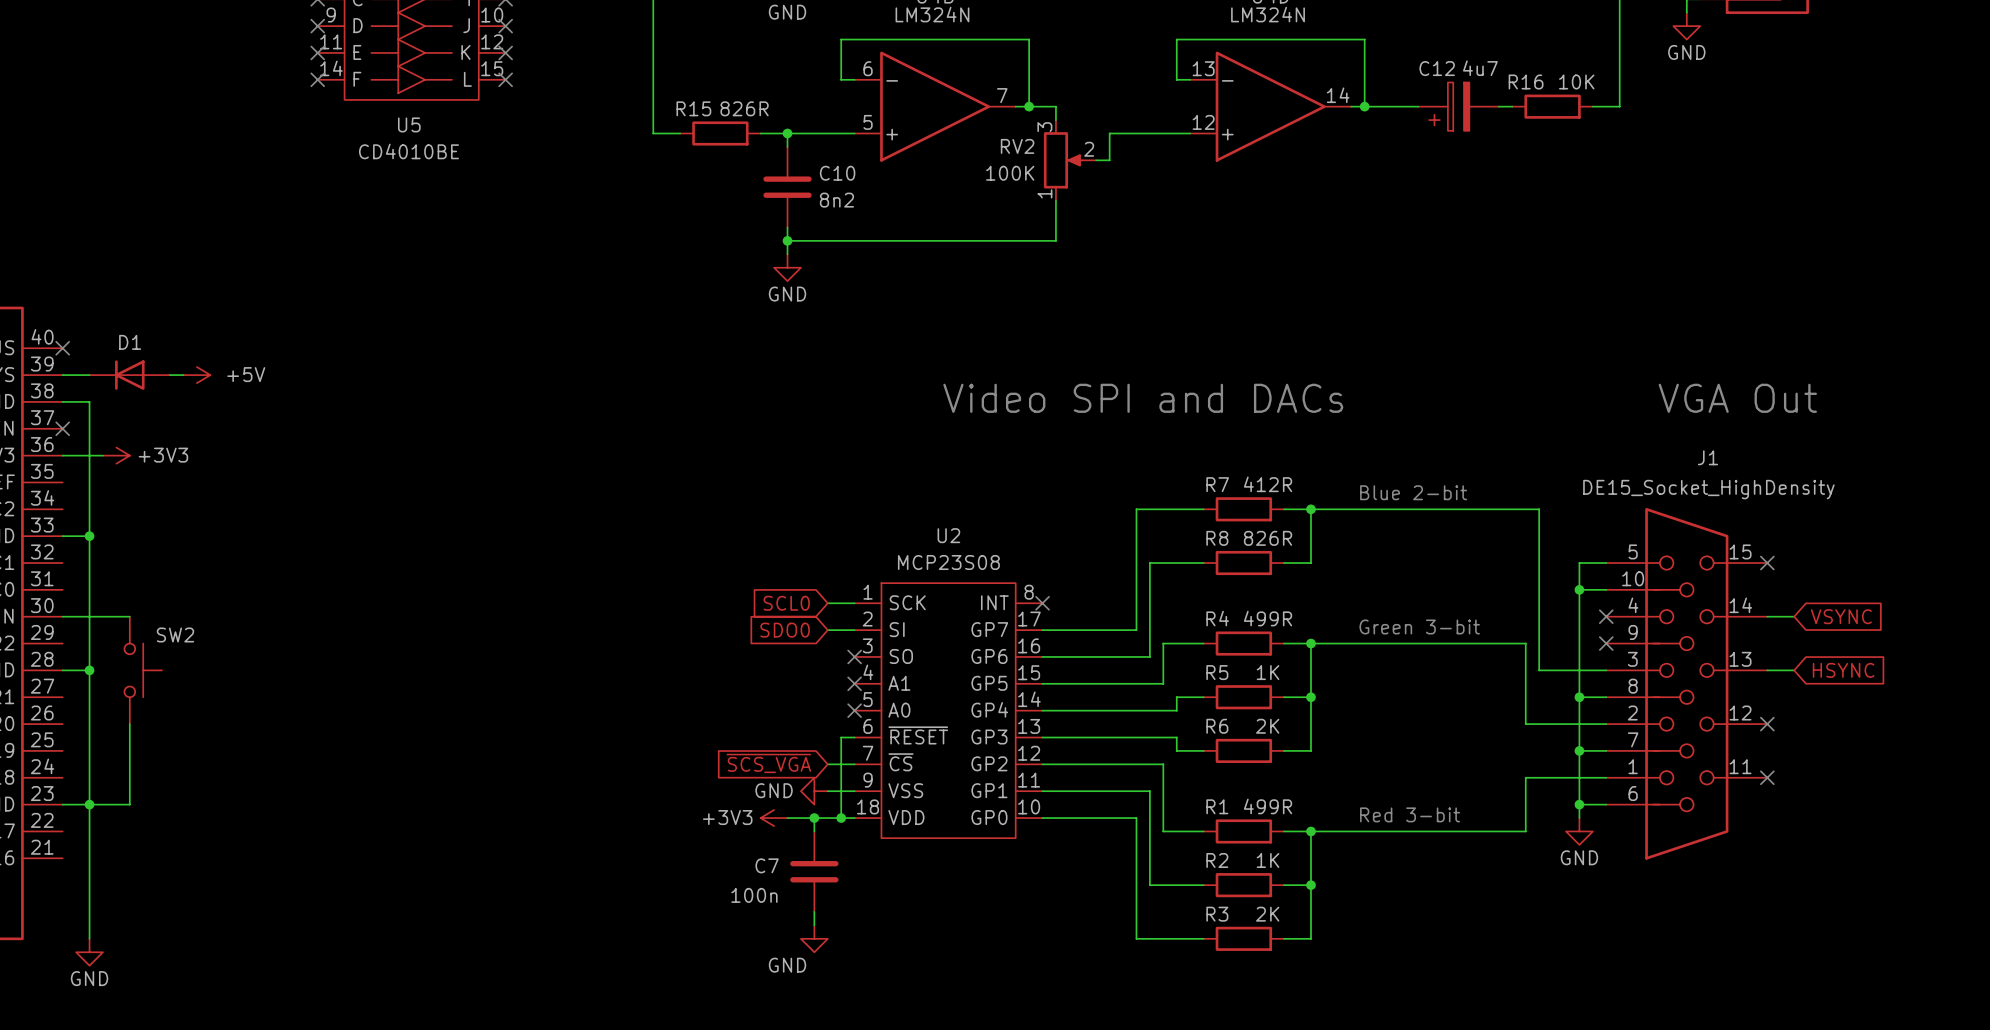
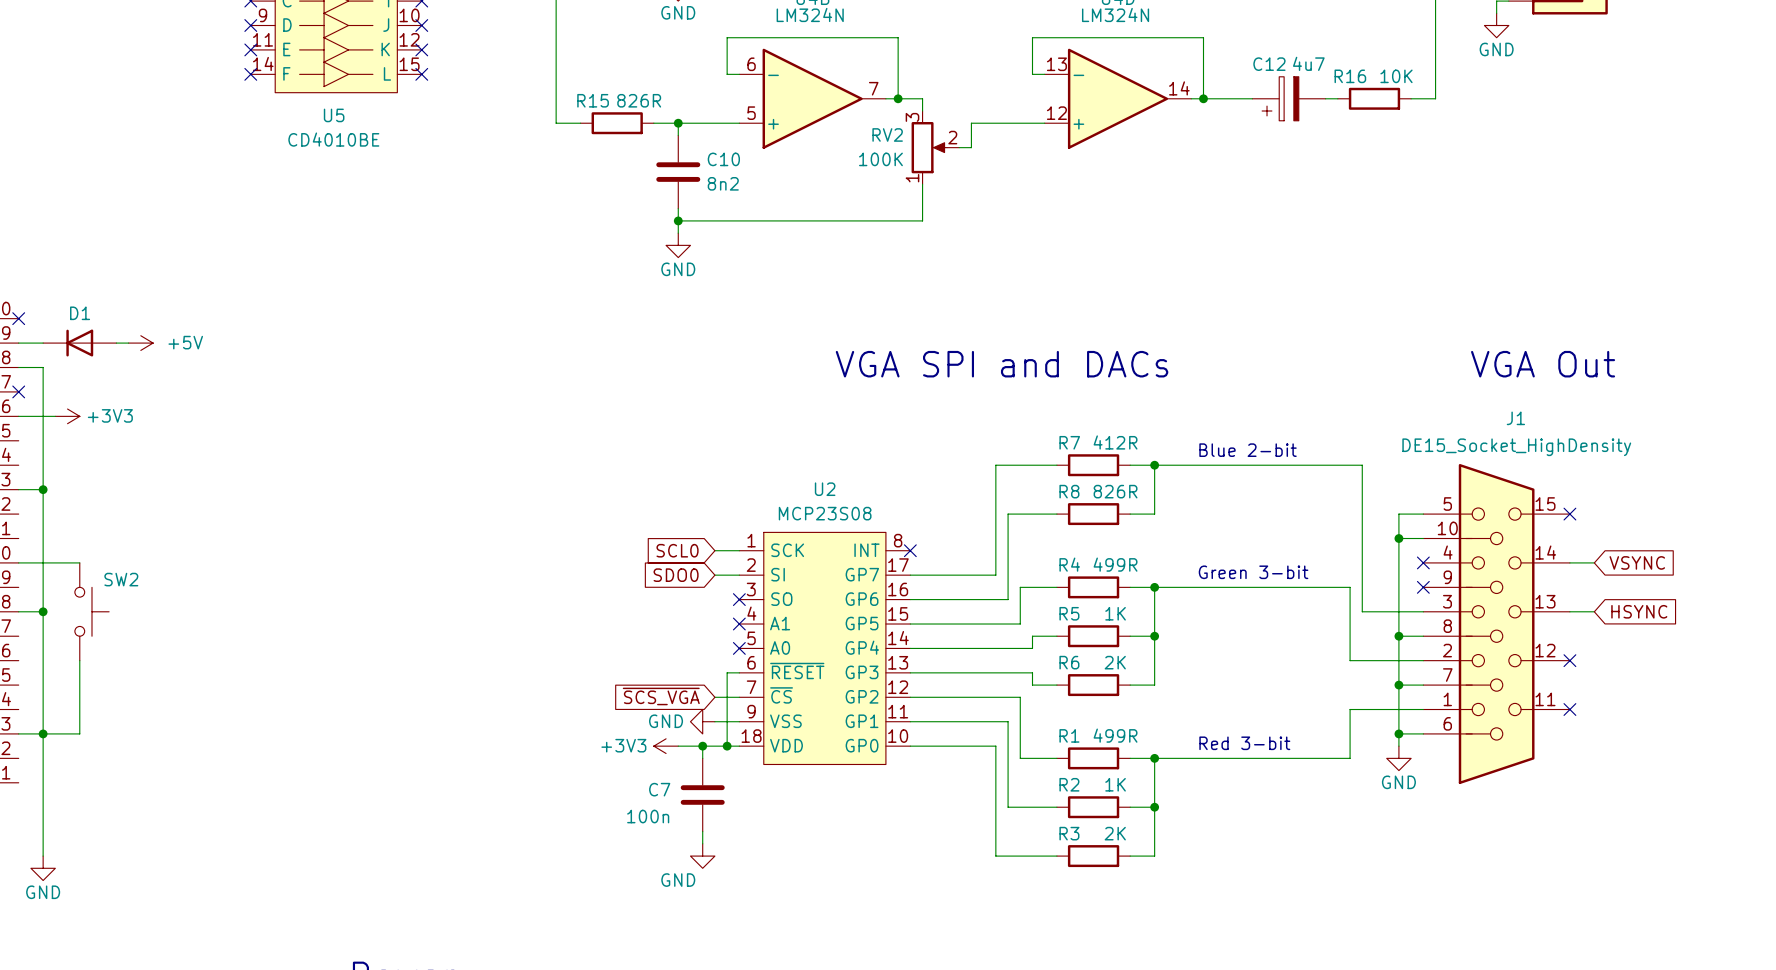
text: Video SPI and DACs (1143, 398) -> VGA SPI and DACs (1002, 364)

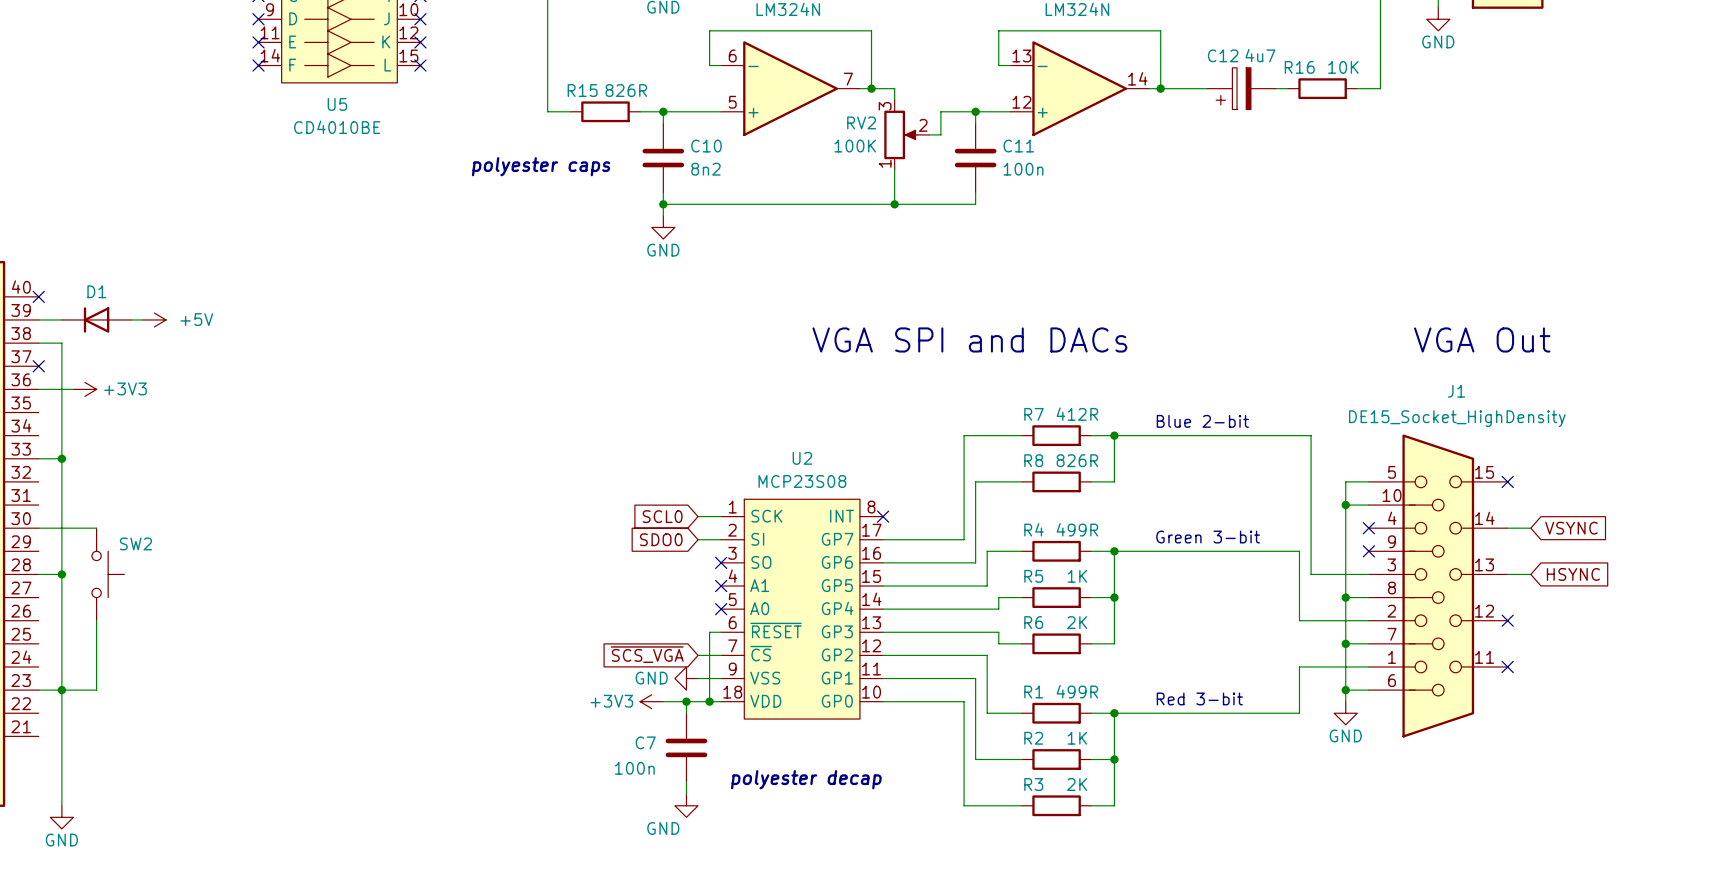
wire: none -> (975, 111) (975, 123)
junction: none -> (975, 111)
C11: none -> 100n (975, 158)
text: none -> polyester caps (541, 166)
wire: none -> (975, 192) (975, 204) (894, 204)
junction: none -> (894, 204)
text: none -> polyester decap (806, 779)

